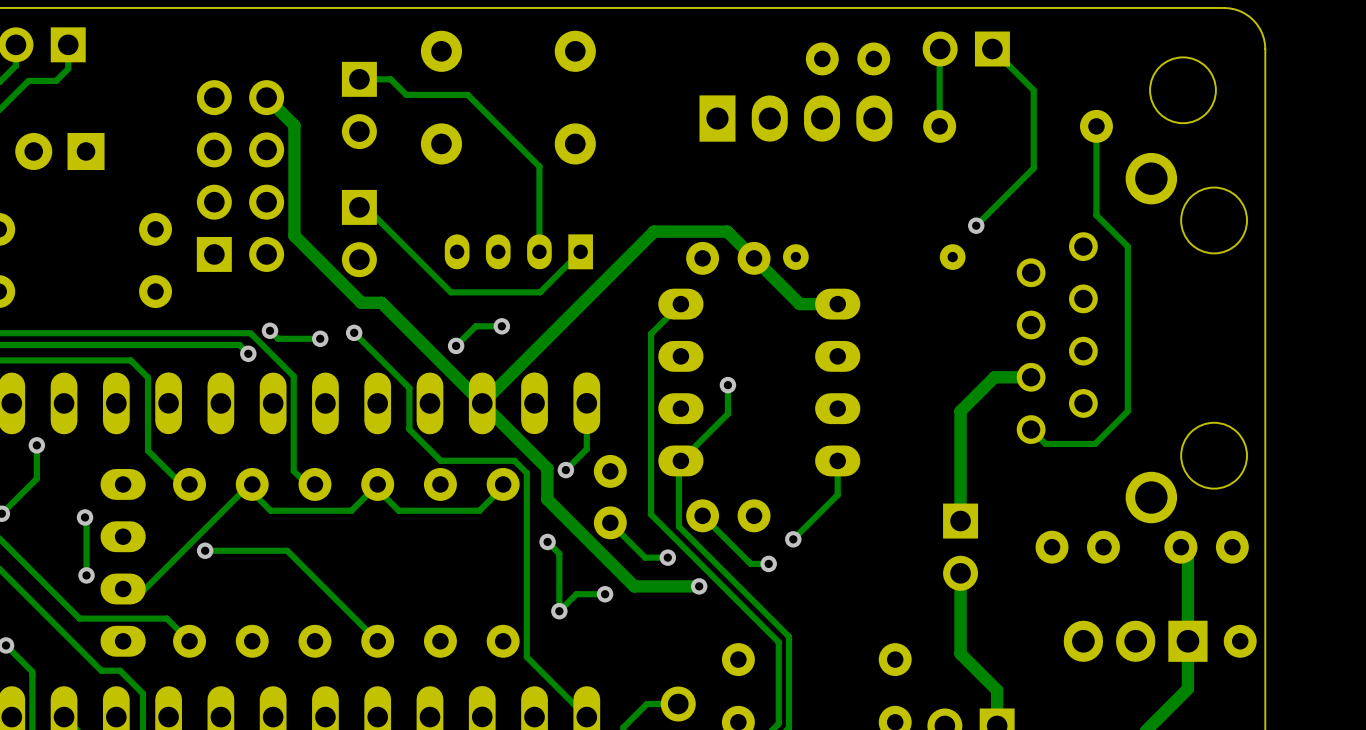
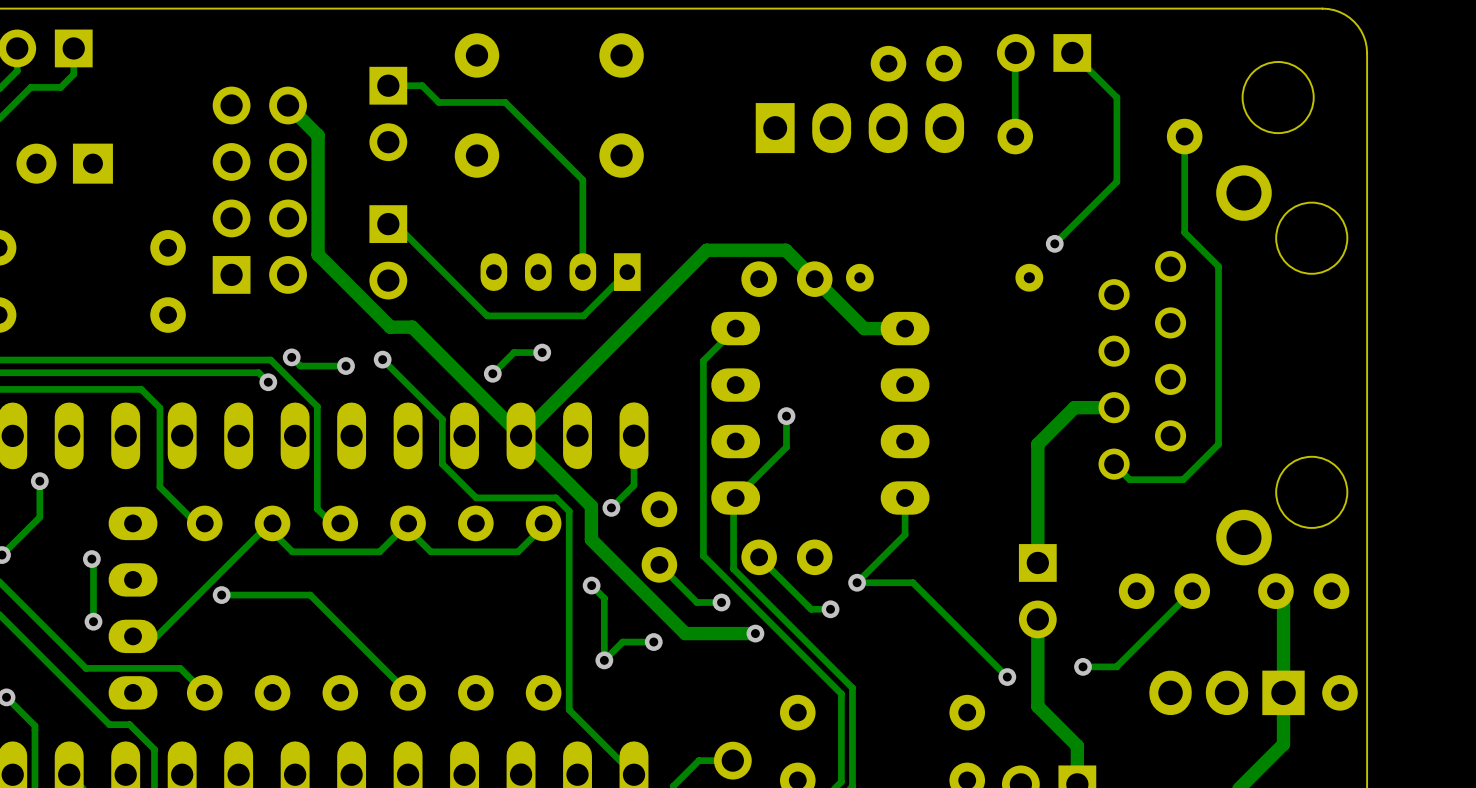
track: none -> (857, 582) (913, 582) (1007, 677)
track: none -> (1192, 591) (1116, 666) (1083, 666)
via: none -> (1083, 666)
via: none -> (1007, 677)

